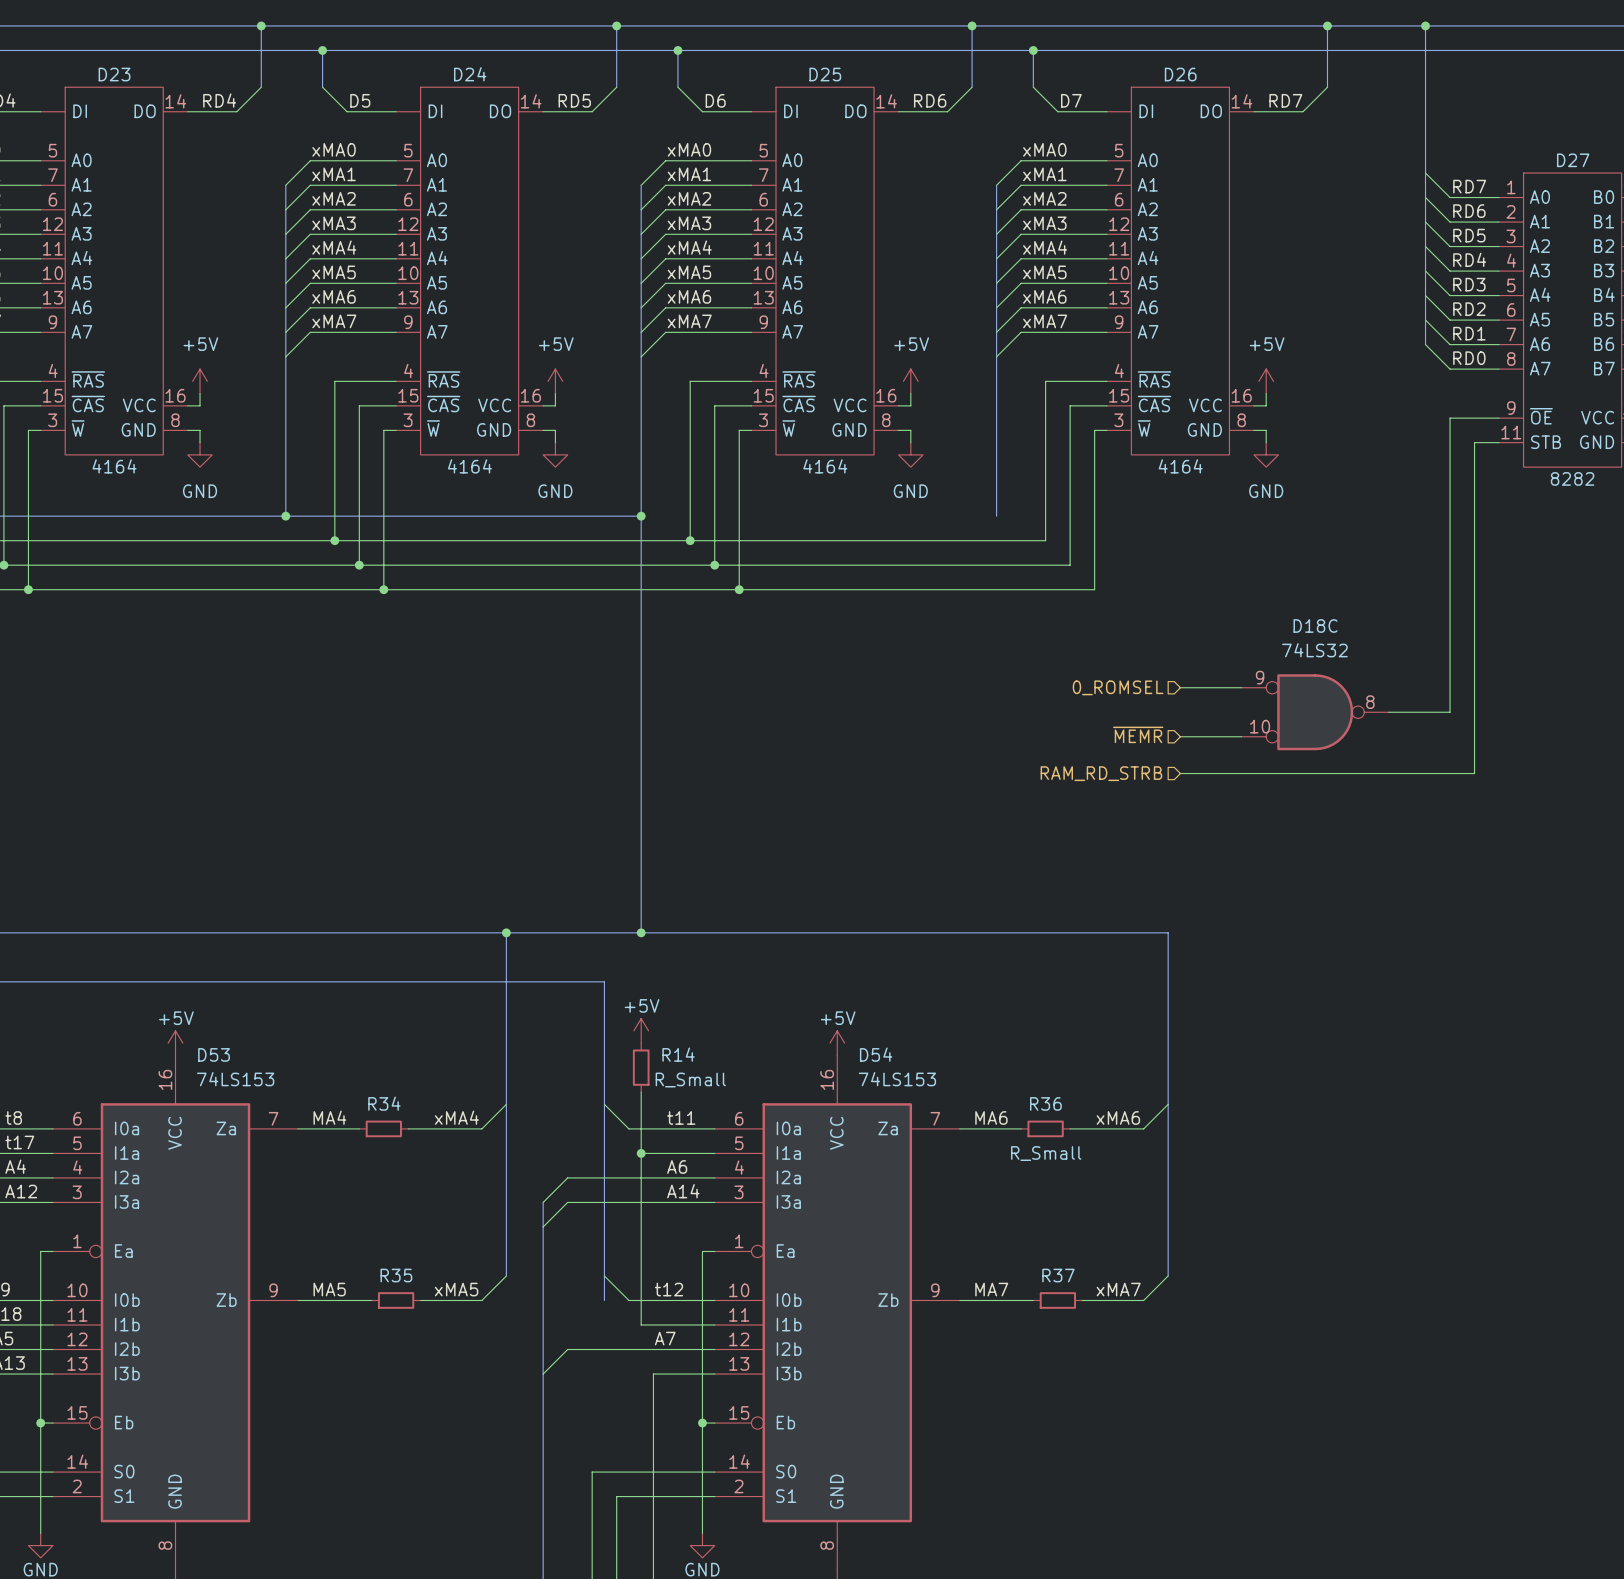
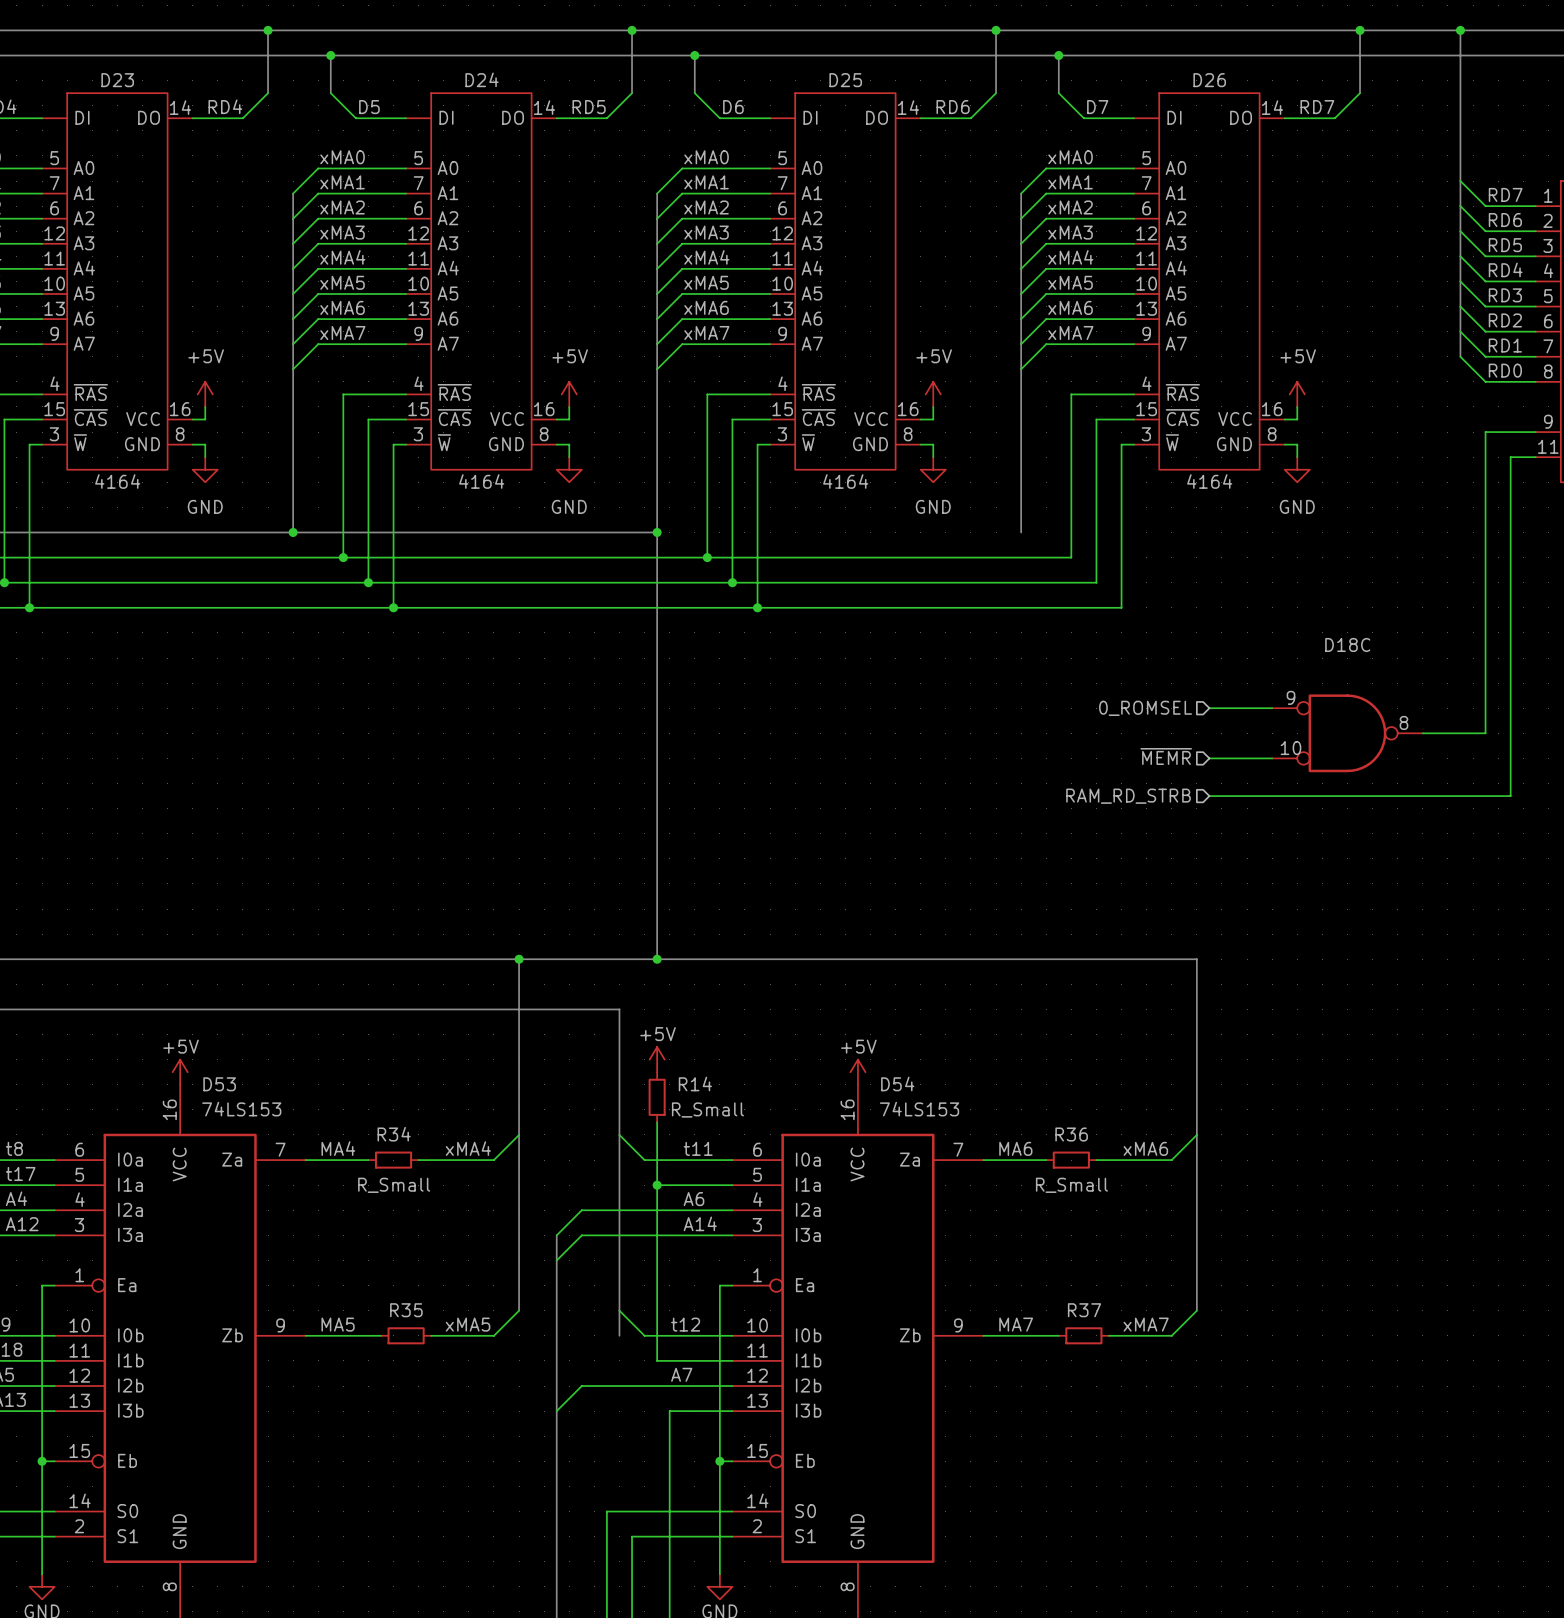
D18C value: 74LS32 (1314, 650) -> none
R34 value: none -> R_Small (394, 1185)

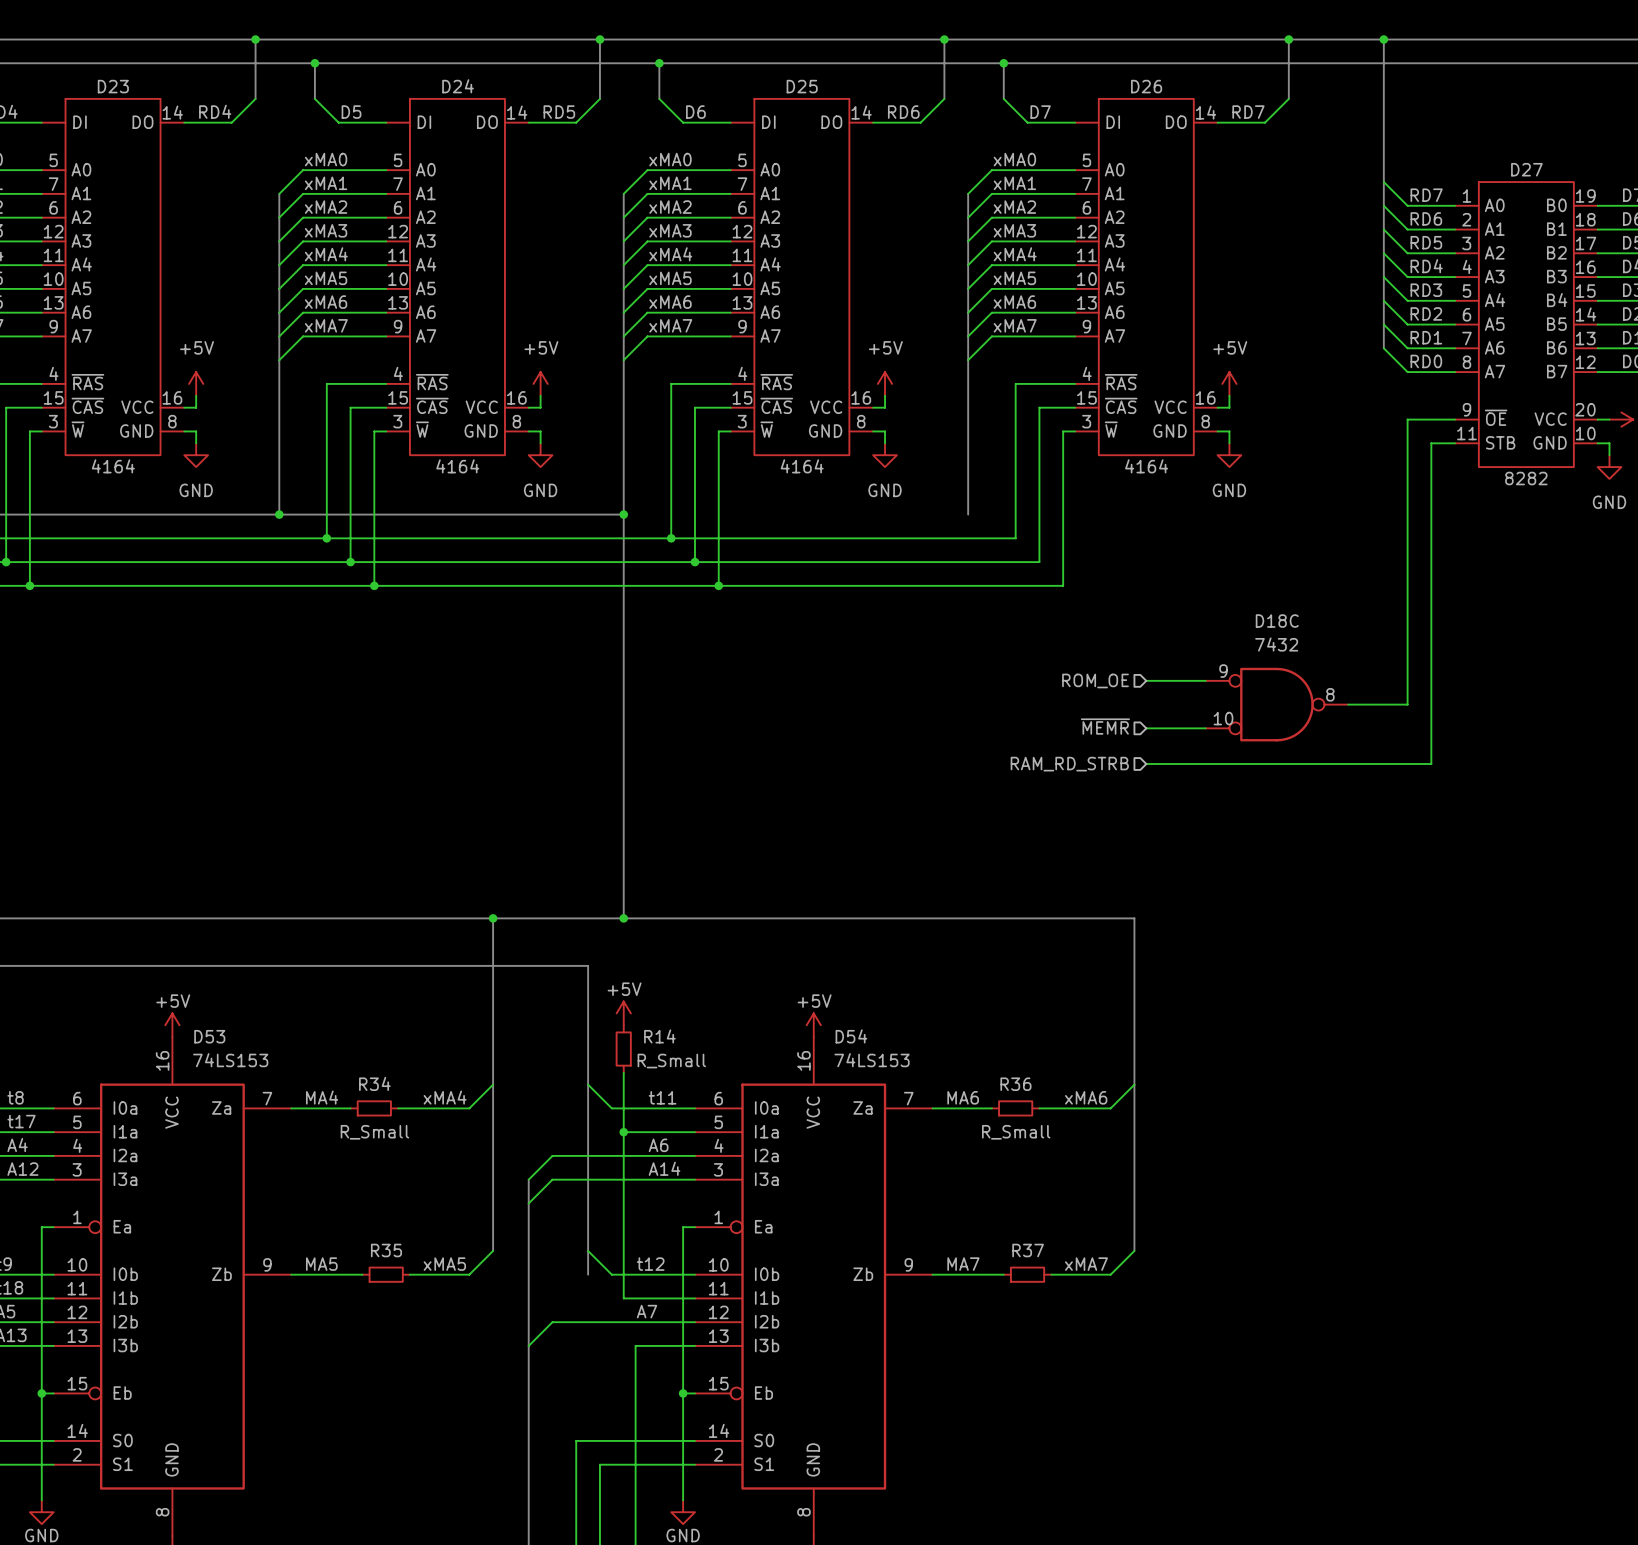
D18C value: none -> 7432 (1276, 644)
hierarchical label: 0_ROMSEL (1145, 708) -> ROM_OE (1095, 680)

